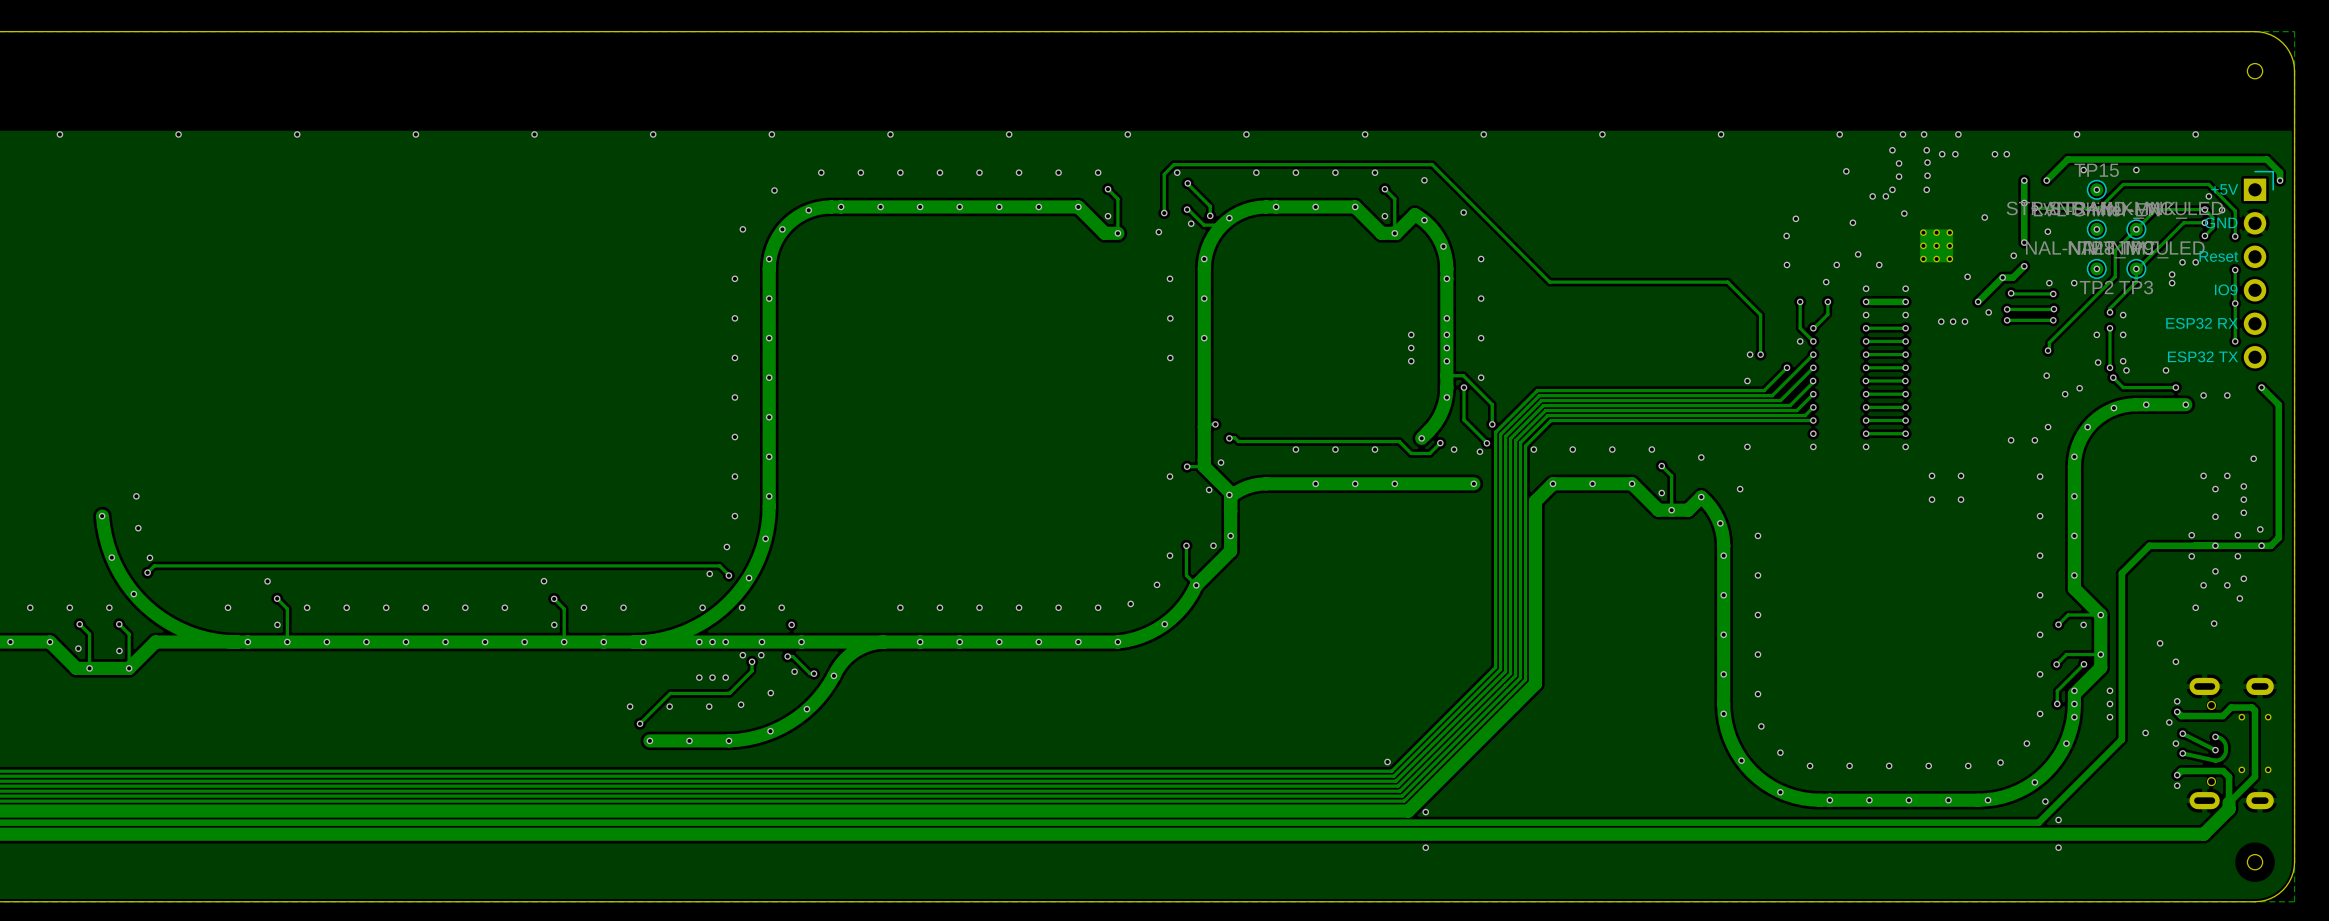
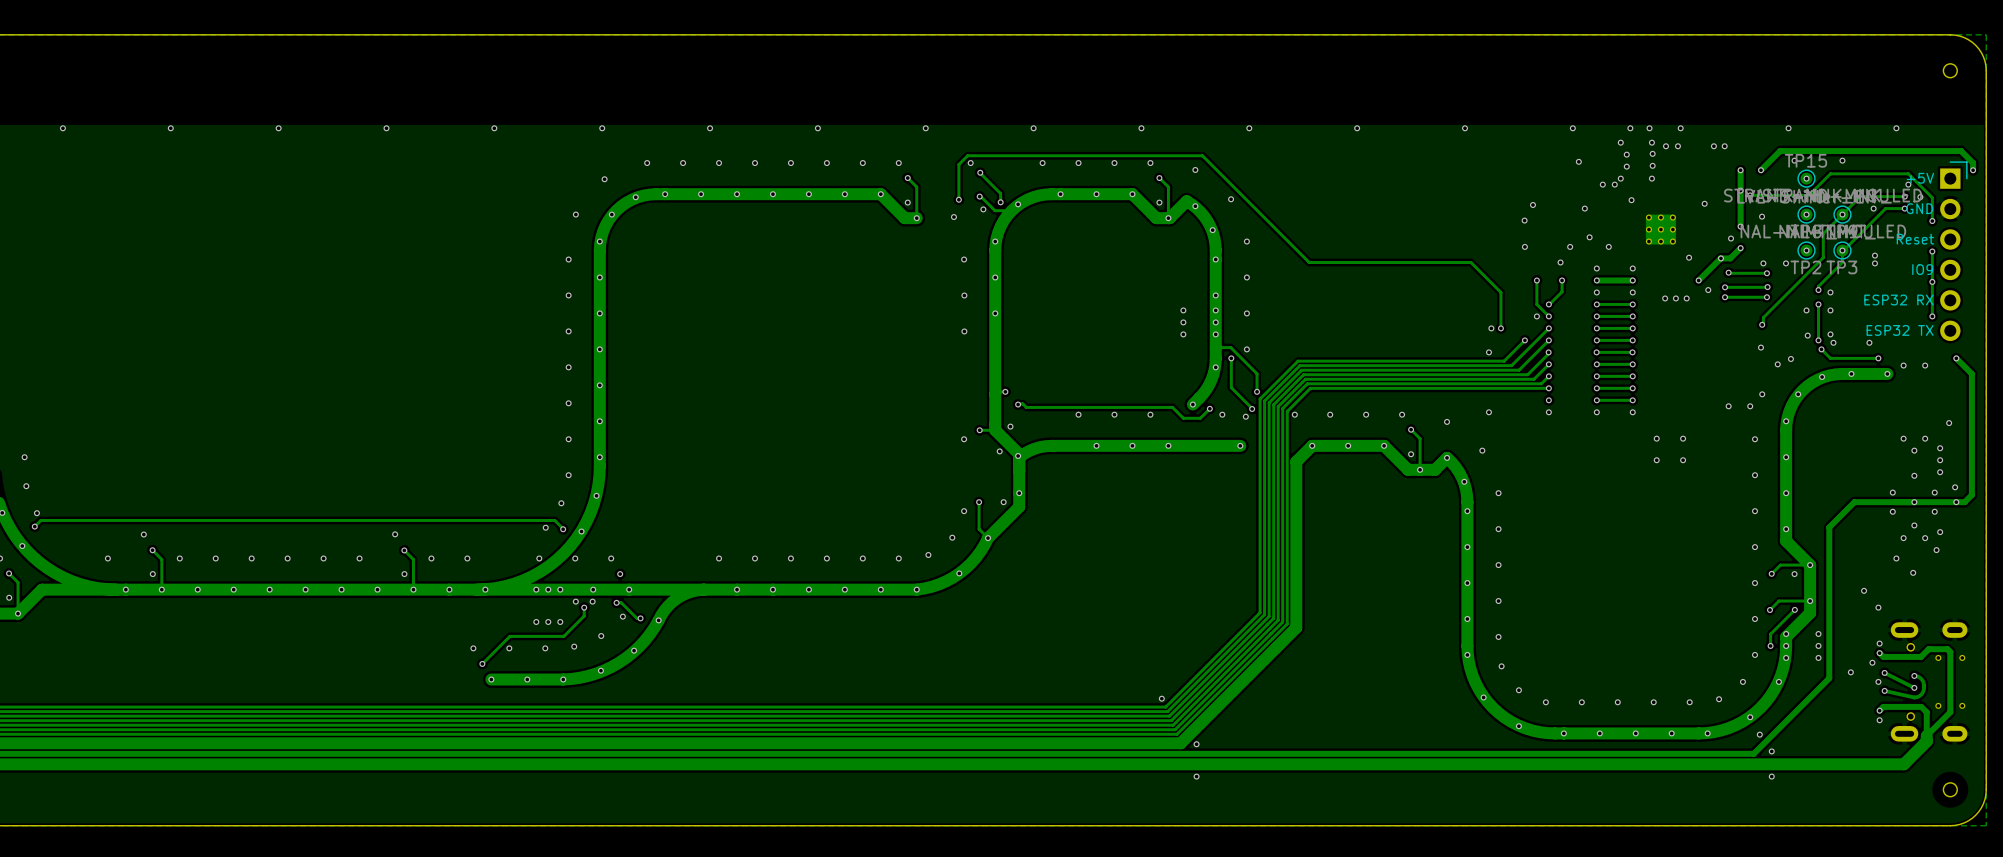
track: (2204, 209) (2212, 217) (2212, 227) (2204, 235) -> none
via: none -> (1873, 208)
via: (2204, 235) -> none
via: (2182, 262) -> none
via: (2195, 262) -> none

